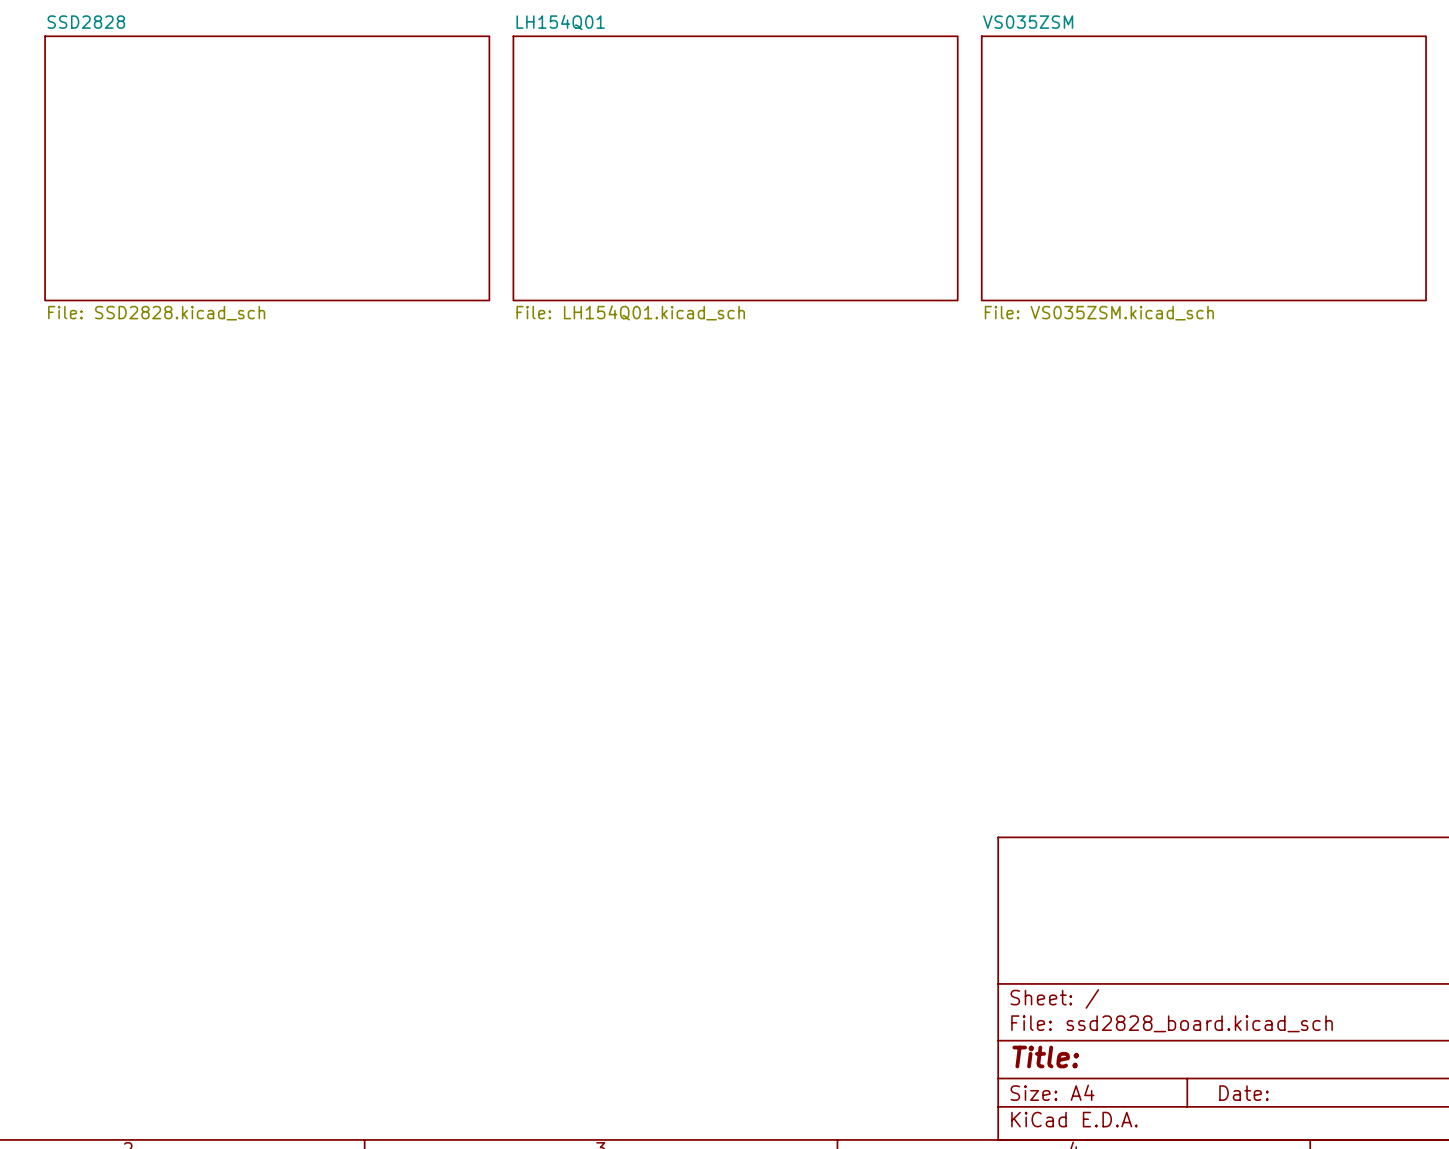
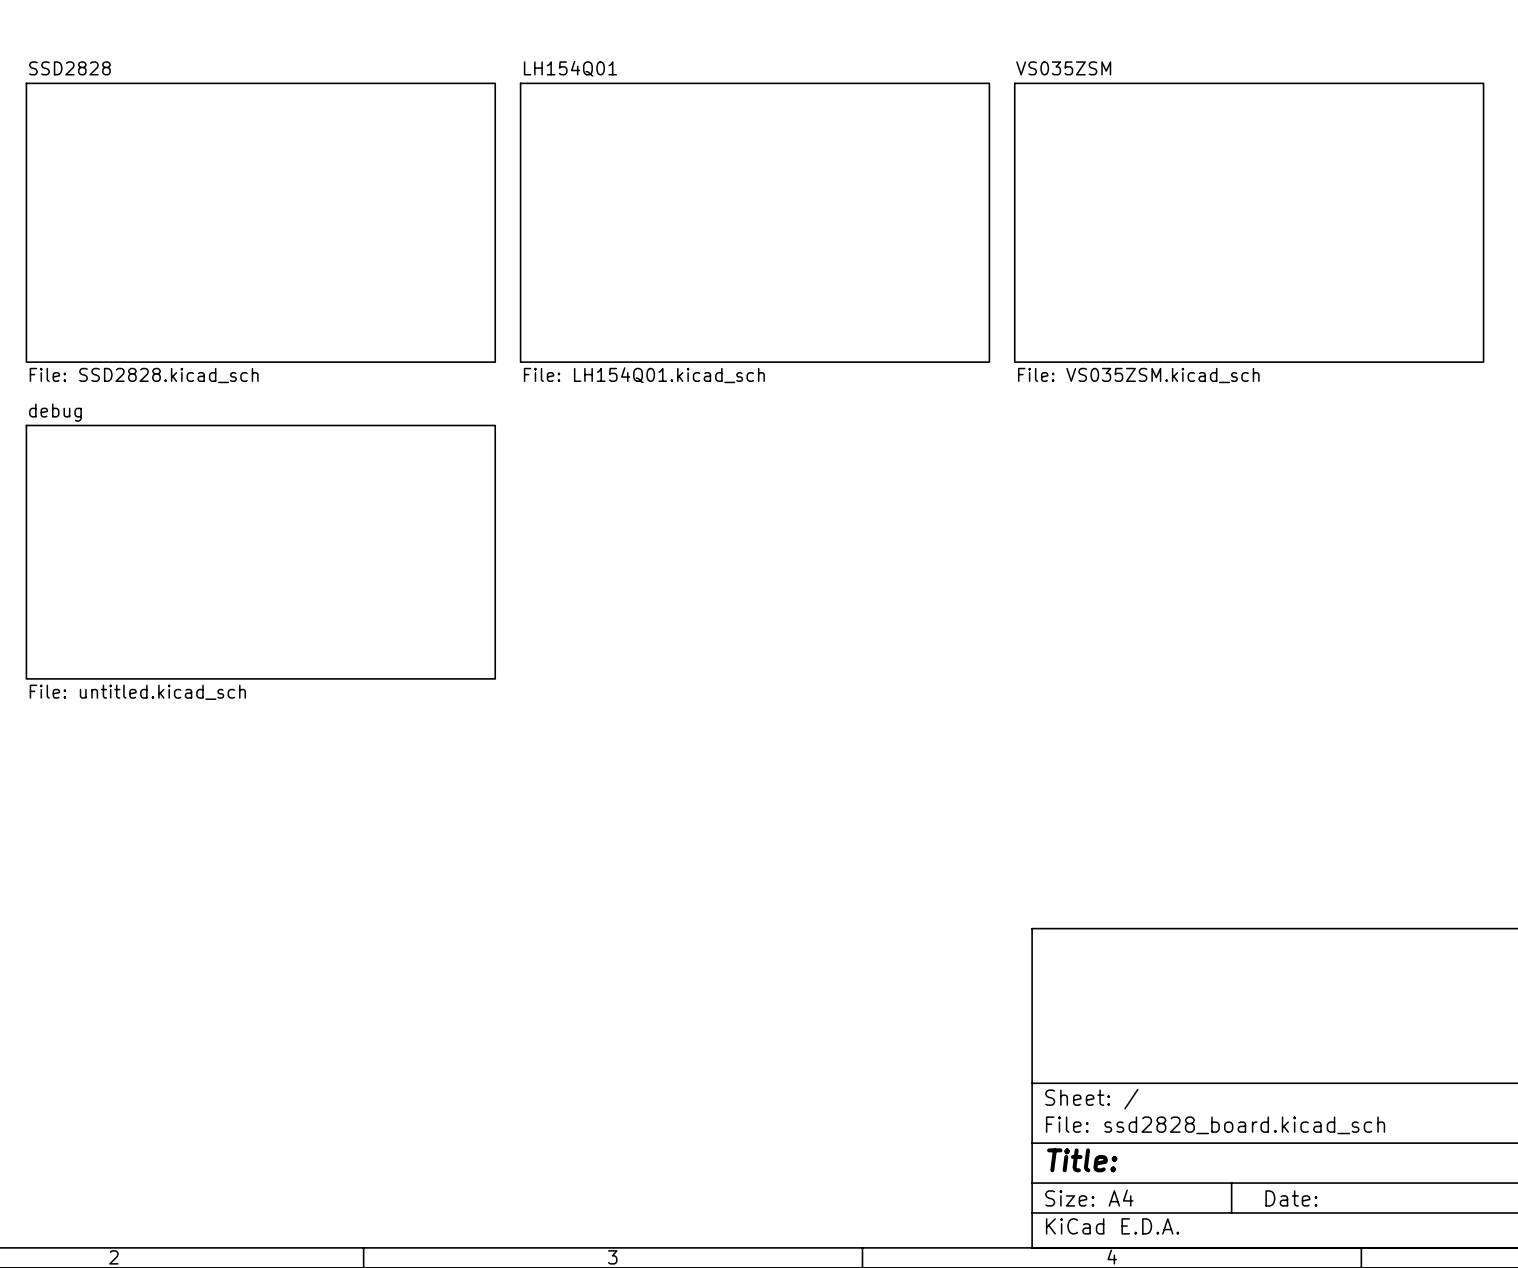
sheet debug: none -> File: untitled.kicad_sch (260, 552)

